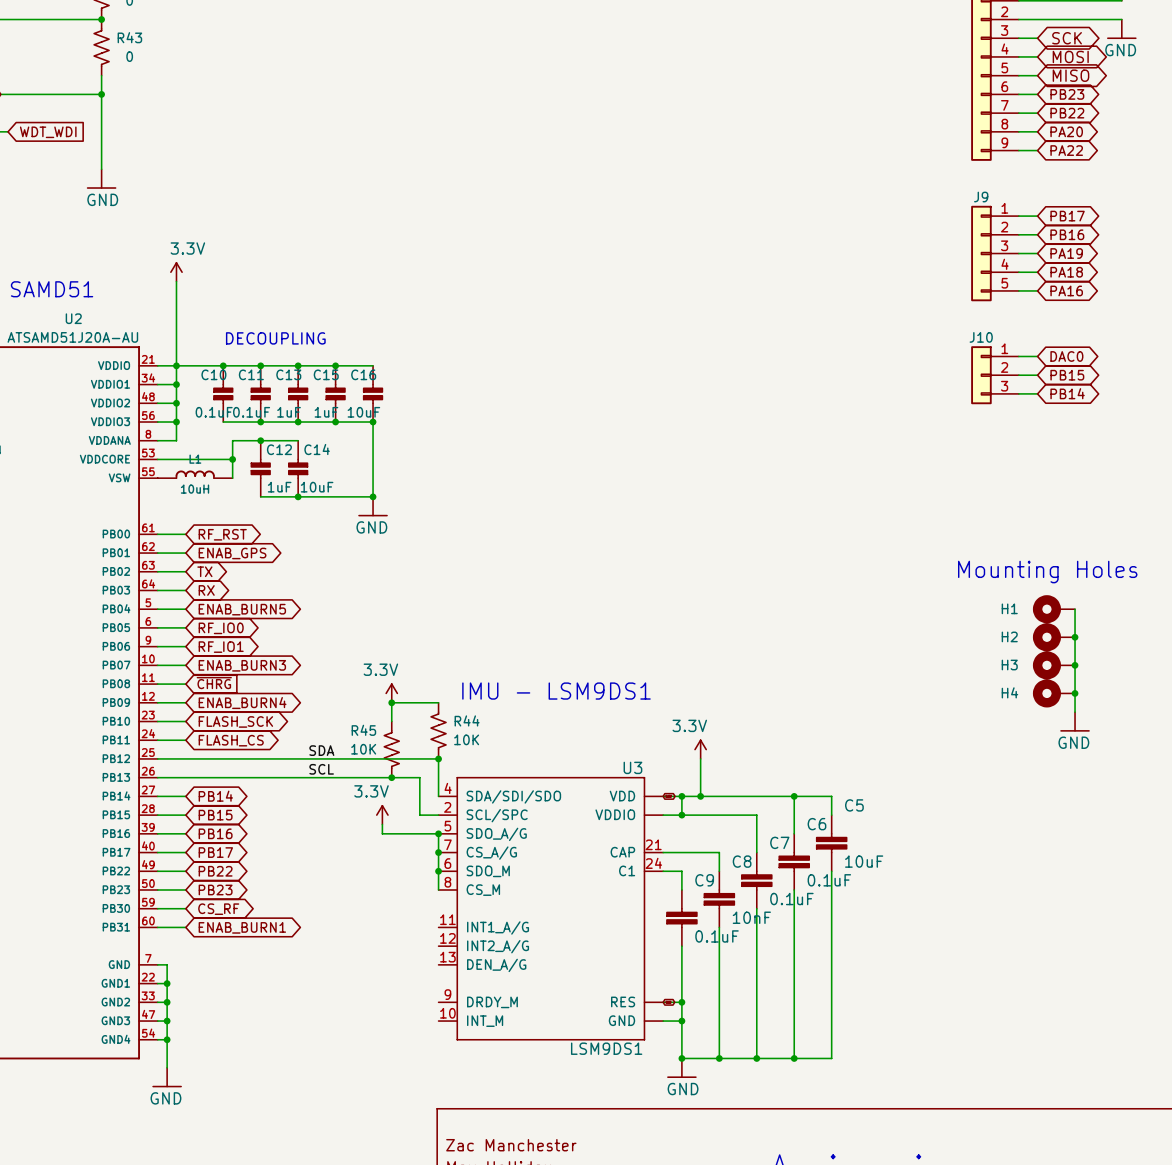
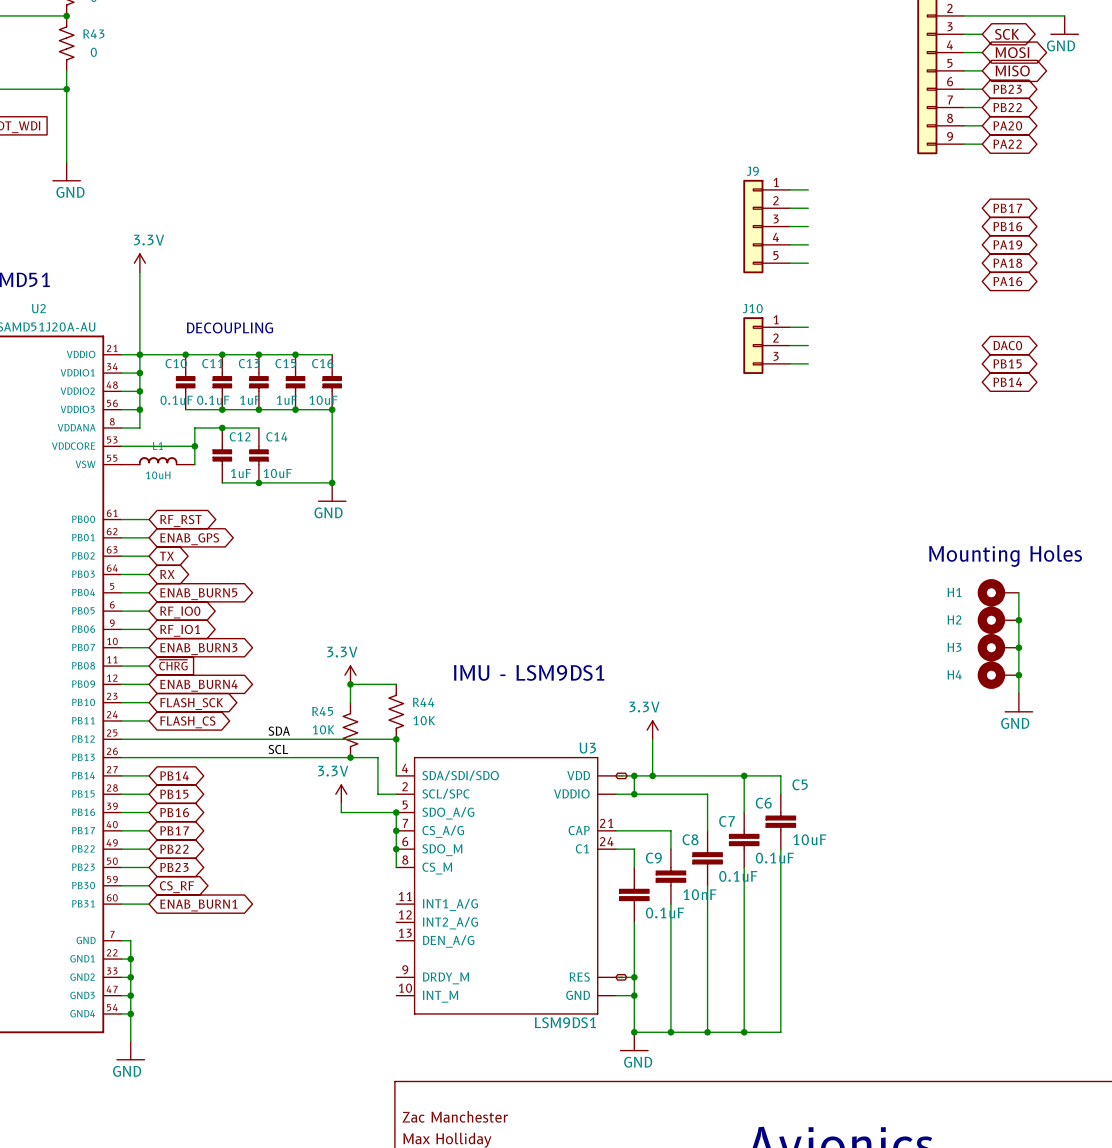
wire: (1018, 216) (1037, 216) -> (789, 189) (808, 189)
wire: (1018, 234) (1037, 234) -> (789, 208) (808, 208)
J9 position: (994, 253) -> (766, 226)
wire: (1018, 253) (1037, 253) -> (789, 226) (808, 226)
wire: (1018, 272) (1037, 272) -> (789, 244) (808, 244)
wire: (1018, 290) (1037, 290) -> (789, 263) (808, 263)
wire: (1018, 356) (1037, 356) -> (789, 327) (808, 327)
J10 position: (994, 375) -> (766, 345)
wire: (1018, 375) (1037, 375) -> (789, 345) (808, 345)
wire: (1018, 393) (1037, 393) -> (789, 363) (808, 363)

